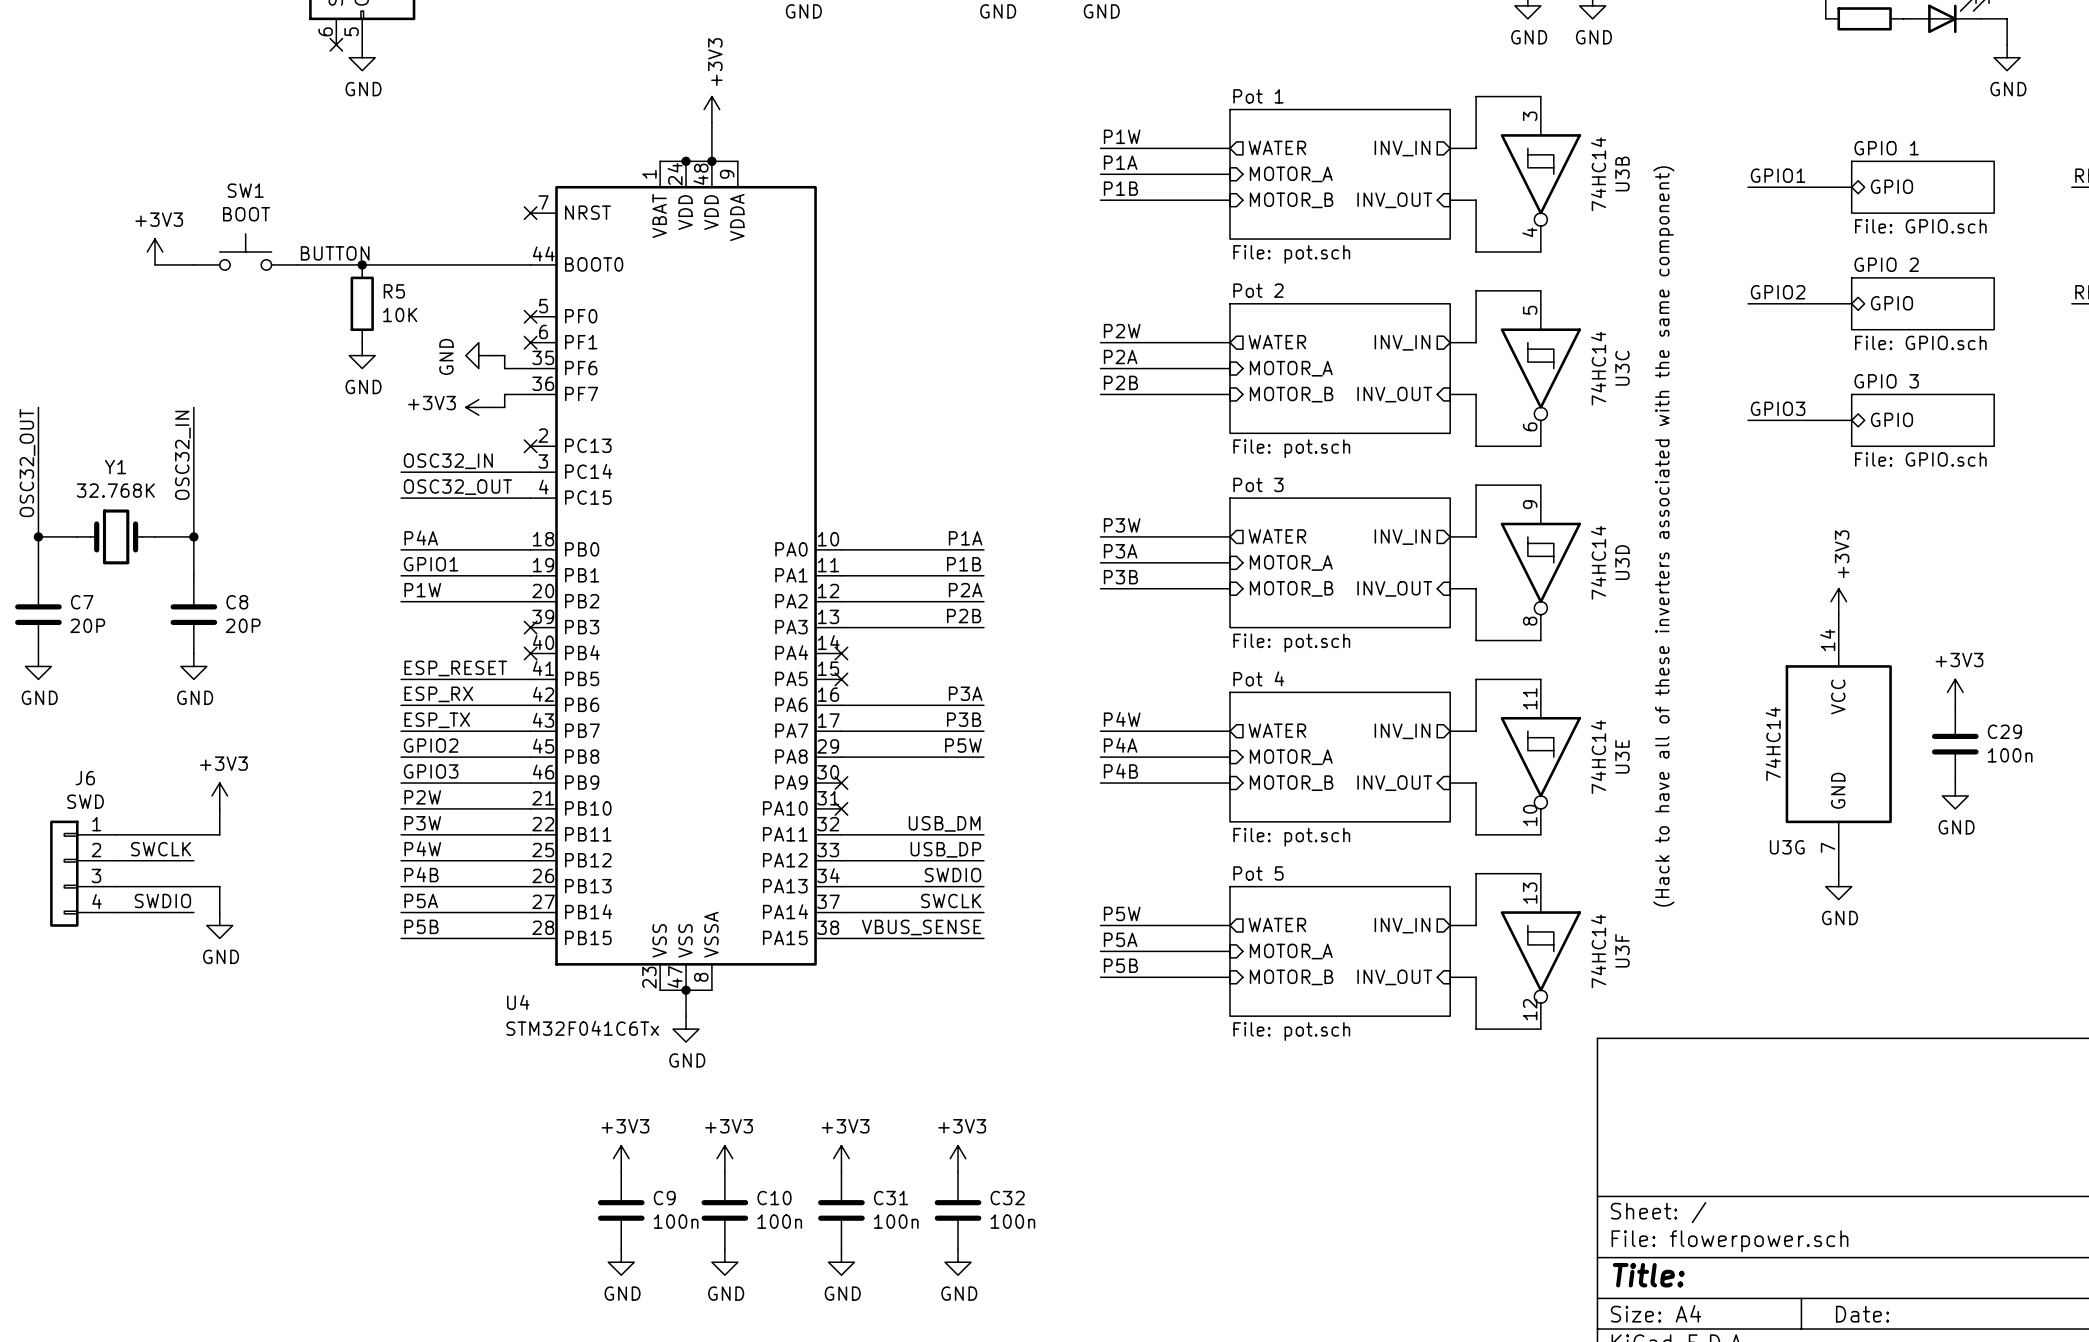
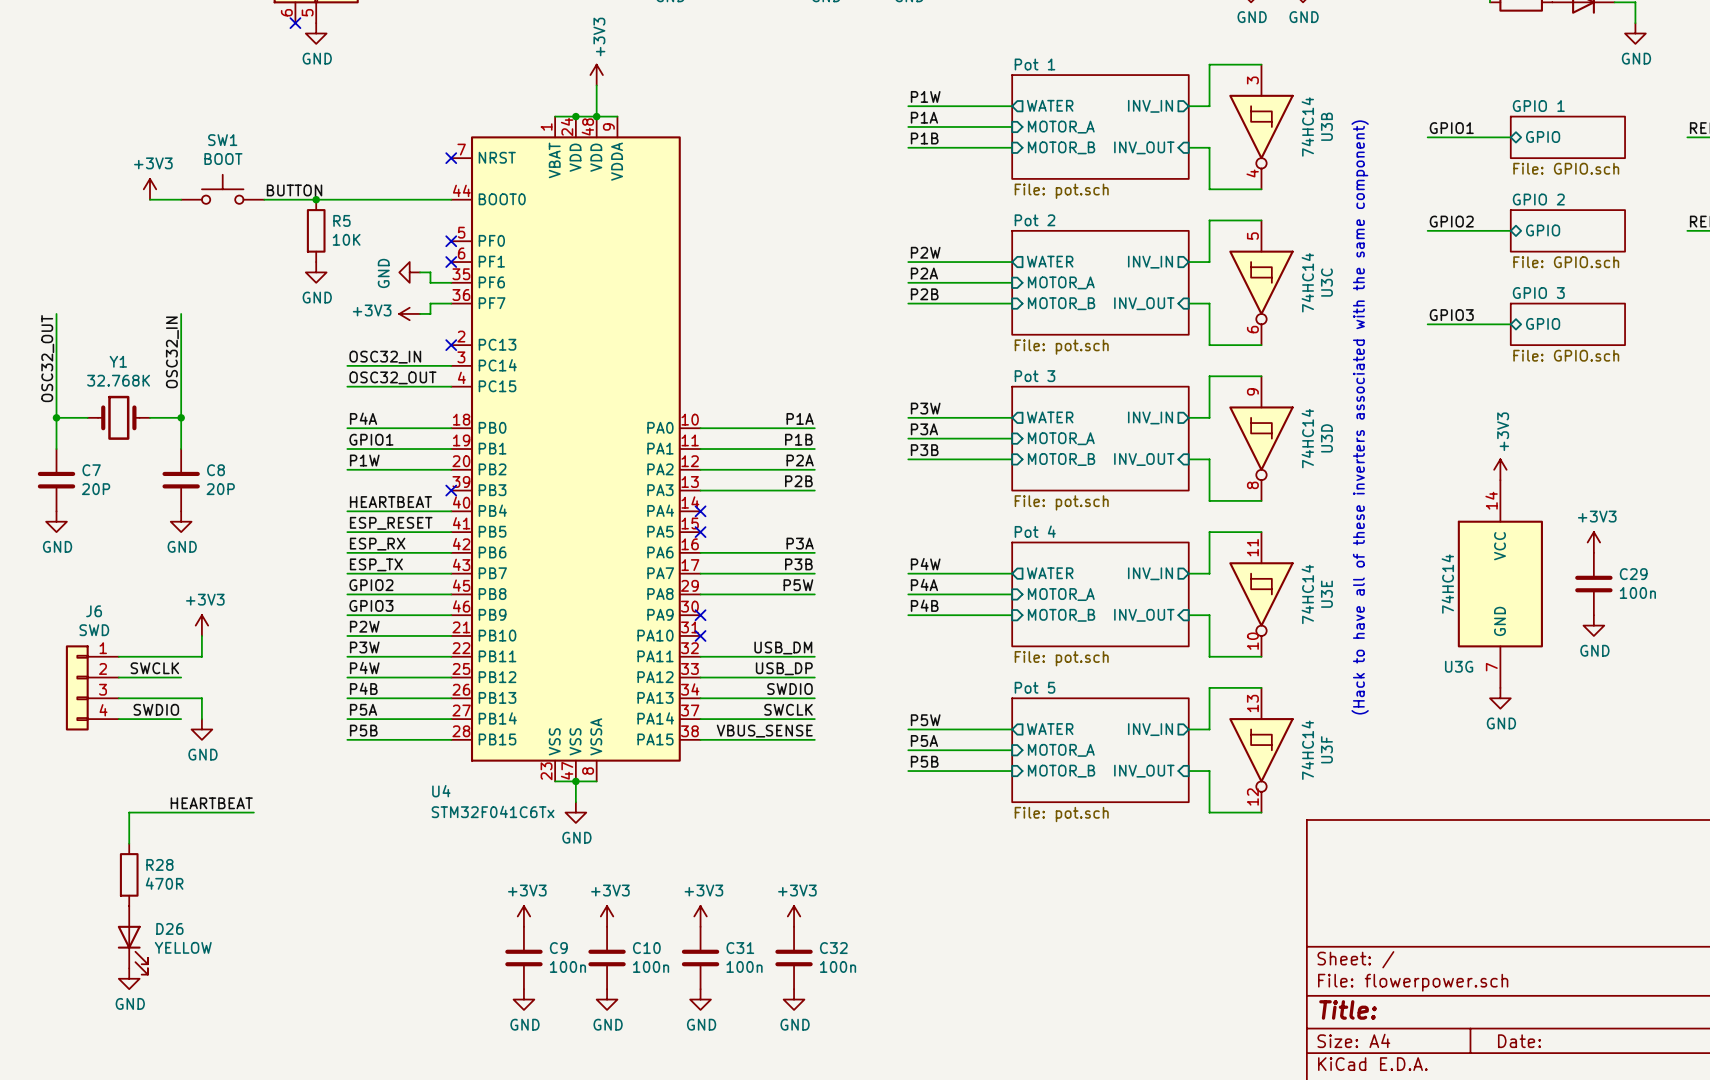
label: none -> HEARTBEAT (390, 502)
wire: none -> (347, 511) (451, 511)
no-connect mark: (530, 653) -> none
label: none -> HEARTBEAT (211, 803)
wire: none -> (253, 812) (129, 812) (129, 843)
R28: none -> 470R (129, 874)
D26: none -> YELLOW (132, 940)
power symbol: none -> GND (129, 978)

